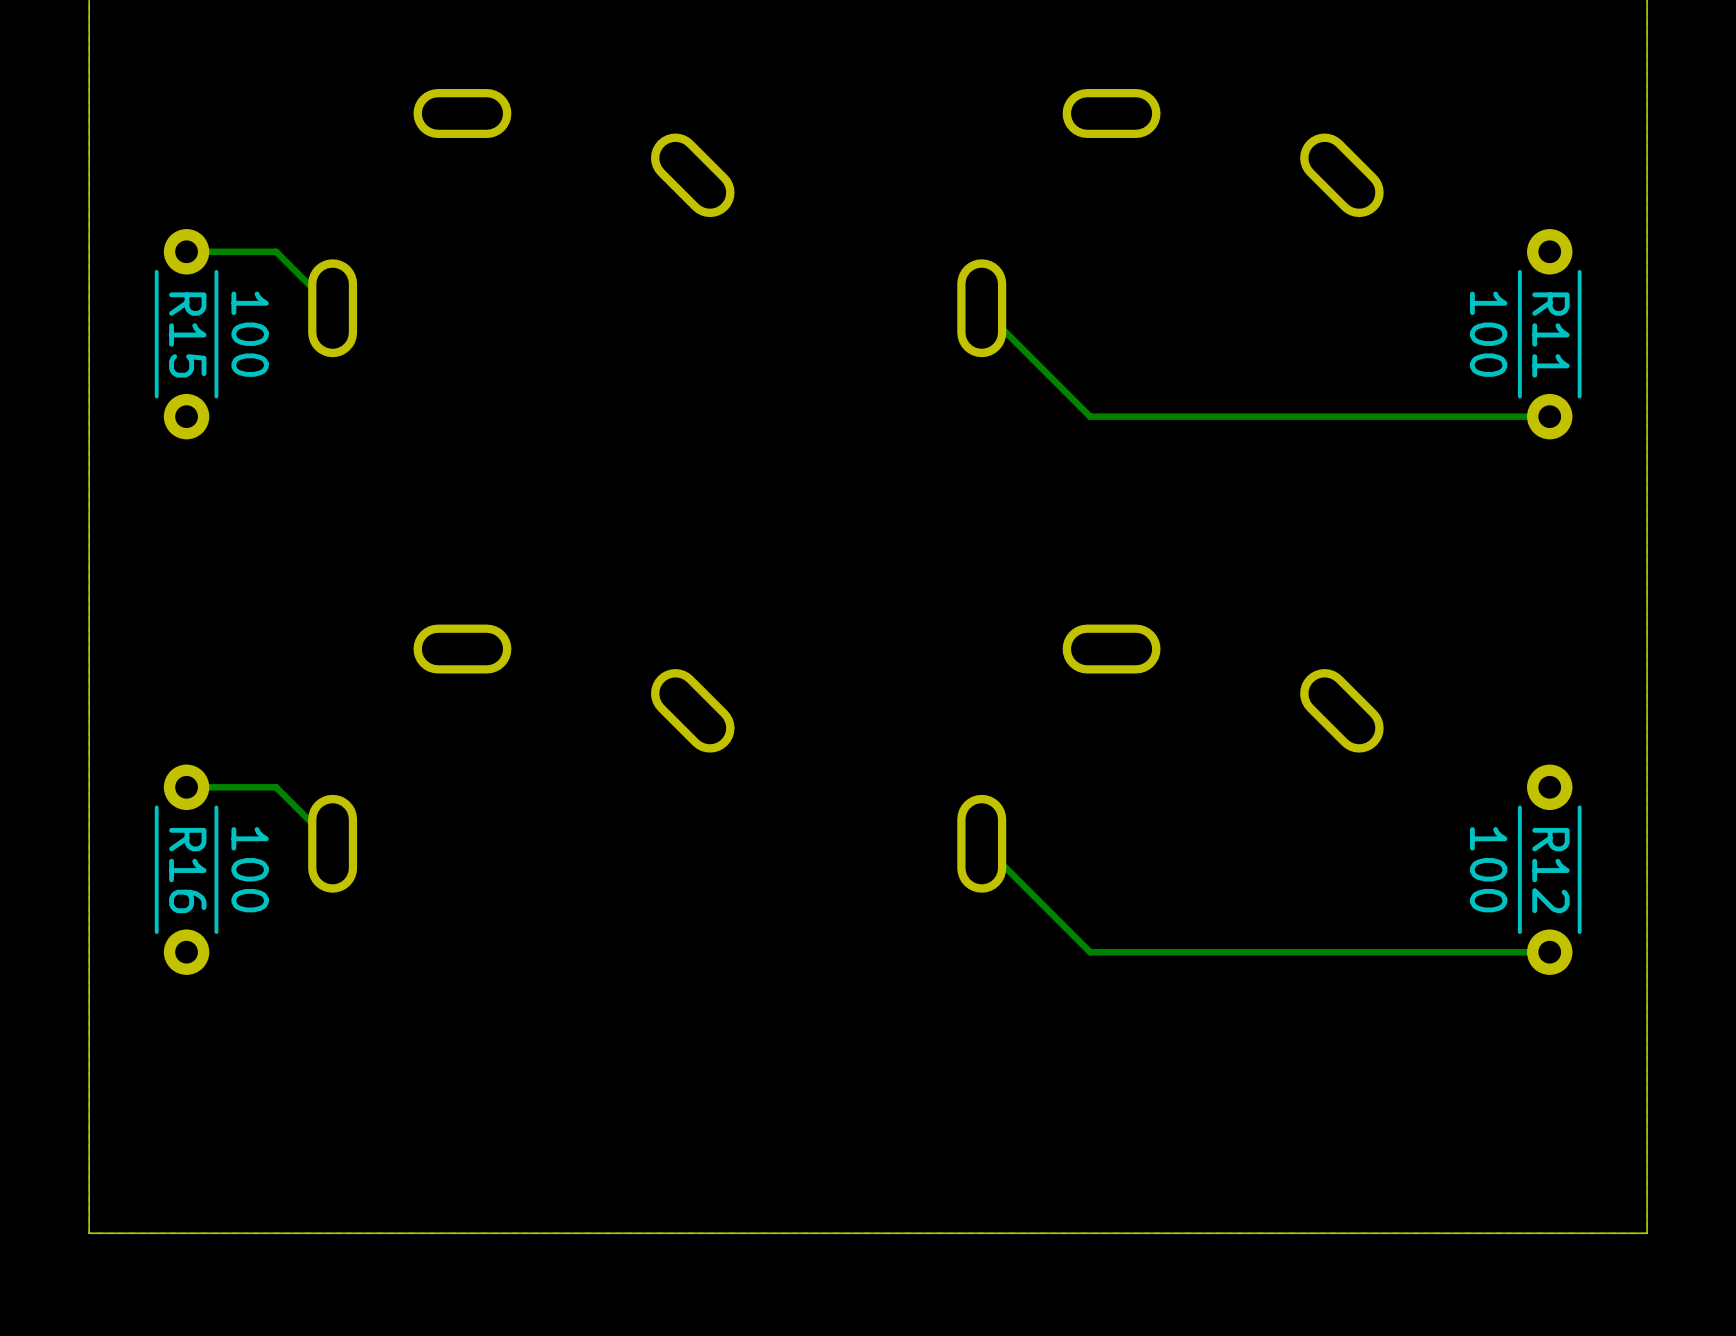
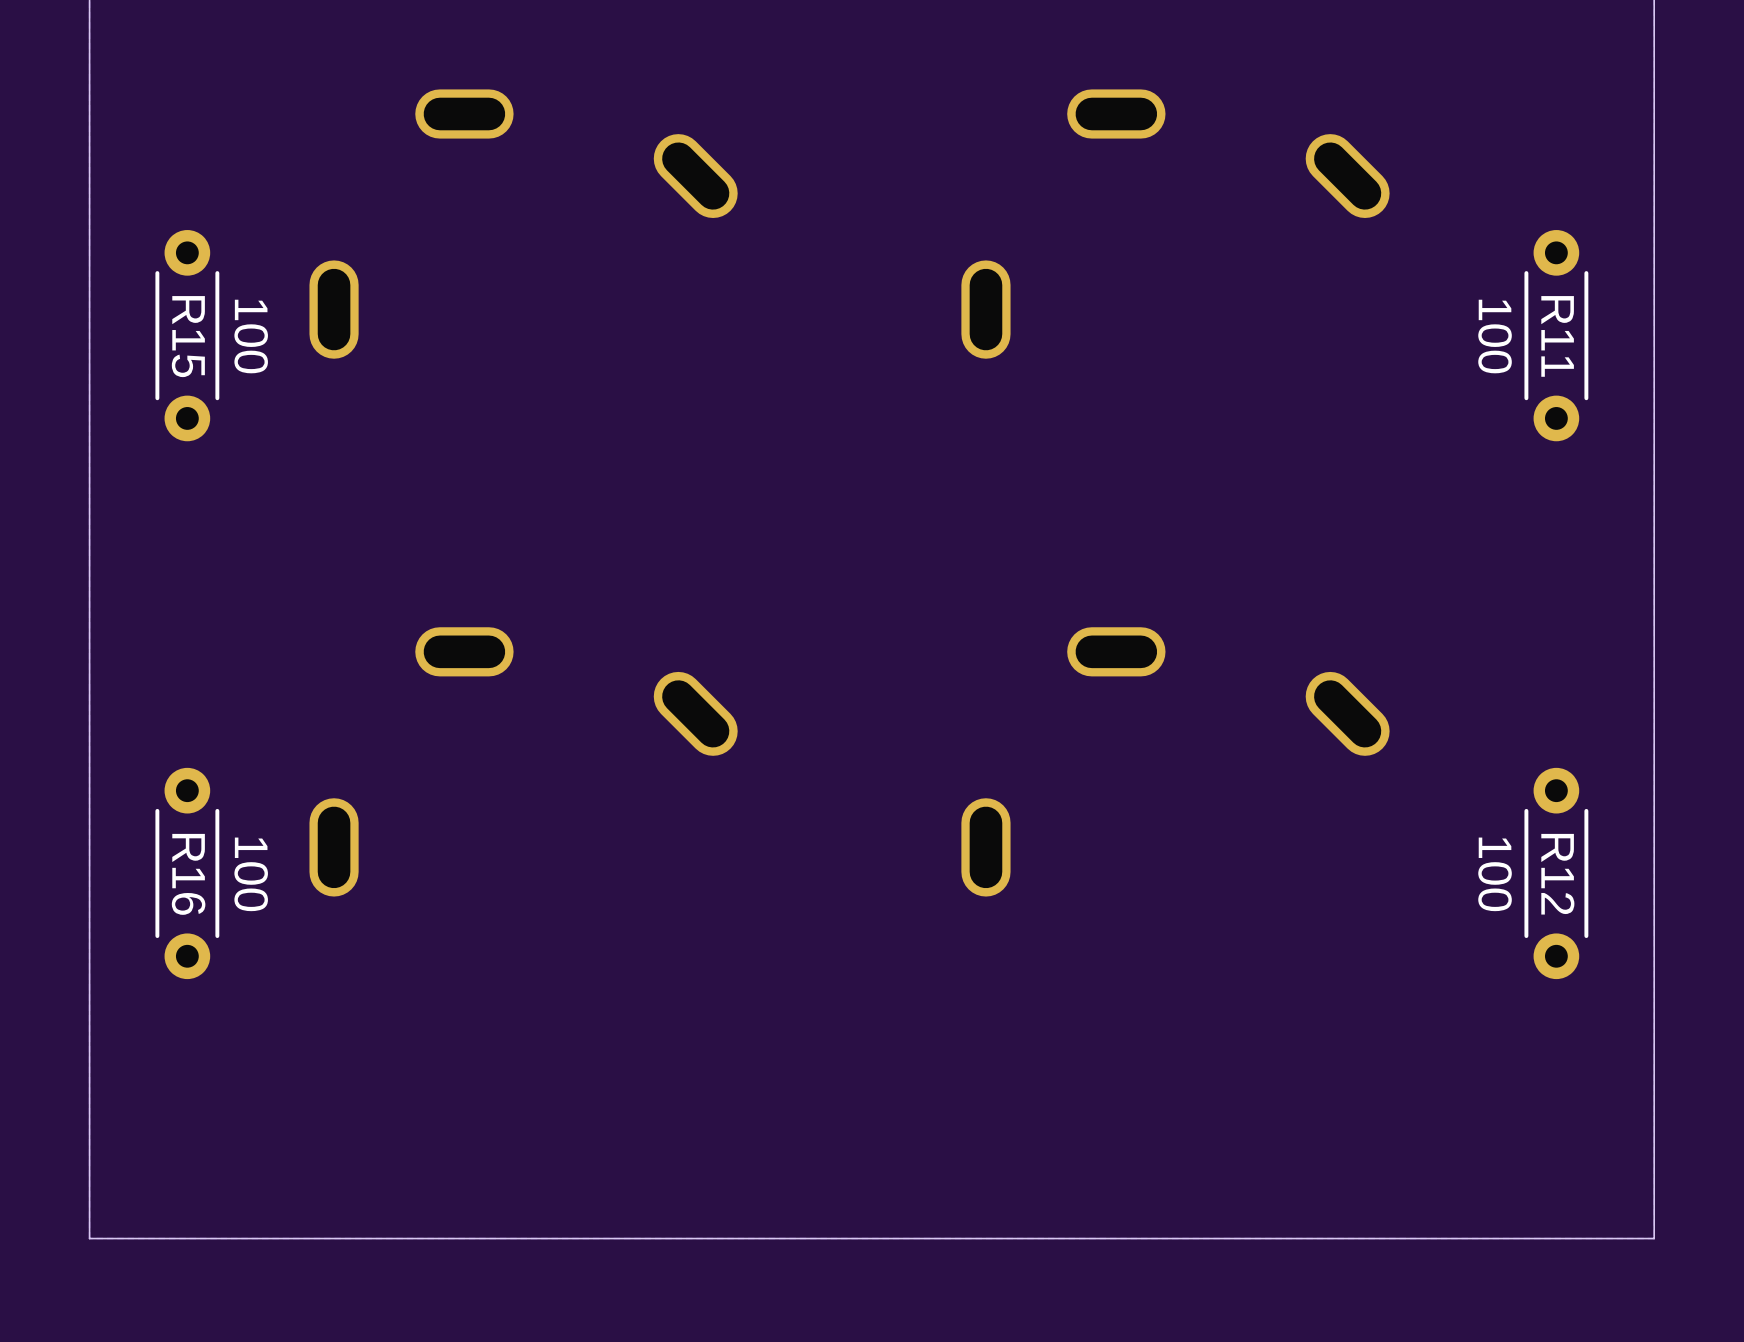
track: (186, 251) (276, 251) (332, 308) -> none
track: (981, 308) (1090, 416) (1549, 416) -> none
track: (186, 787) (276, 787) (332, 843) -> none
track: (981, 843) (1090, 952) (1549, 952) -> none

